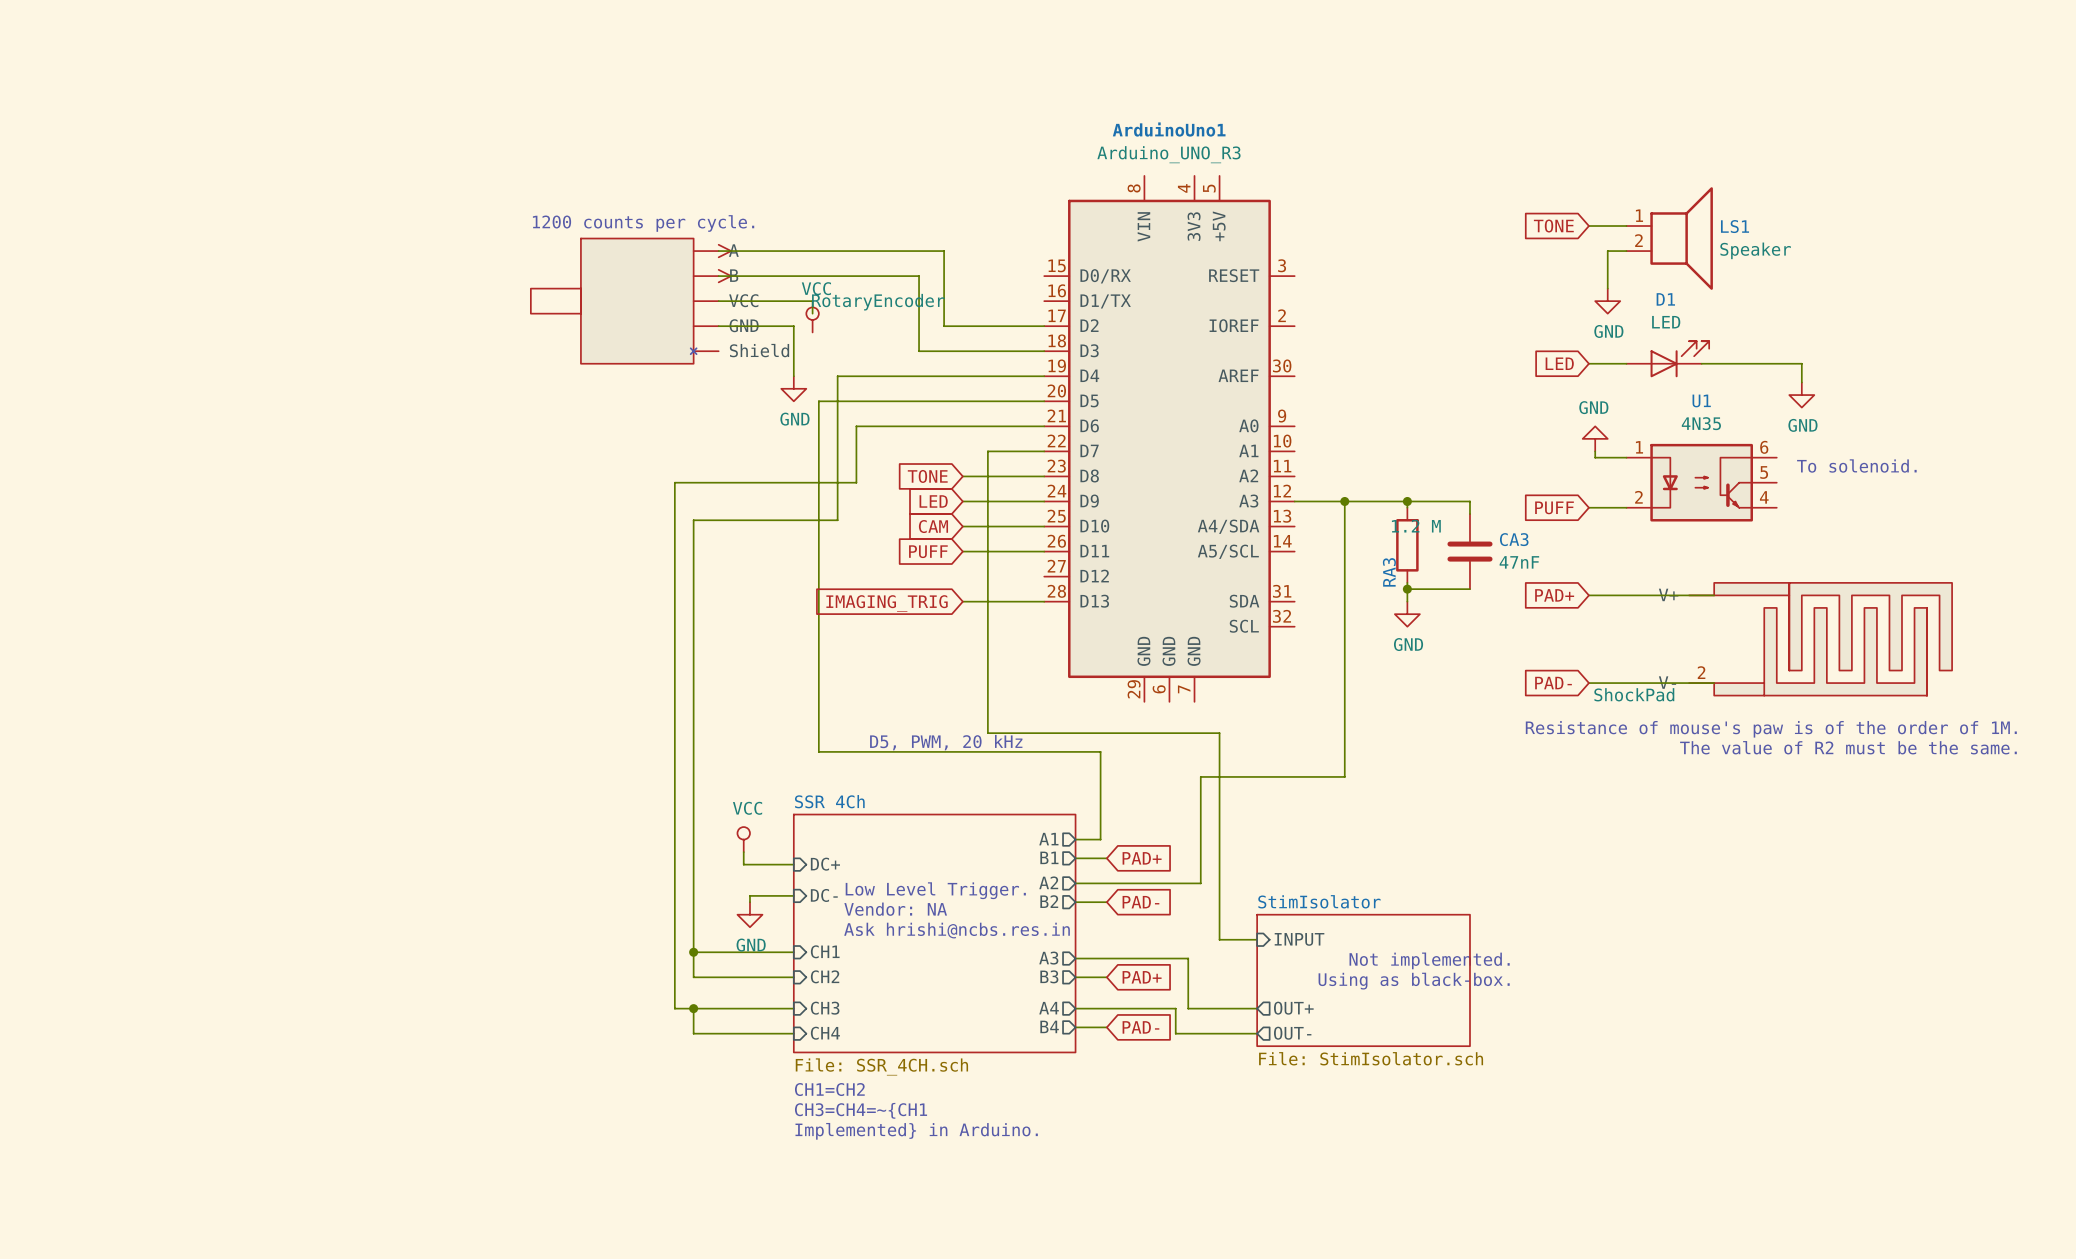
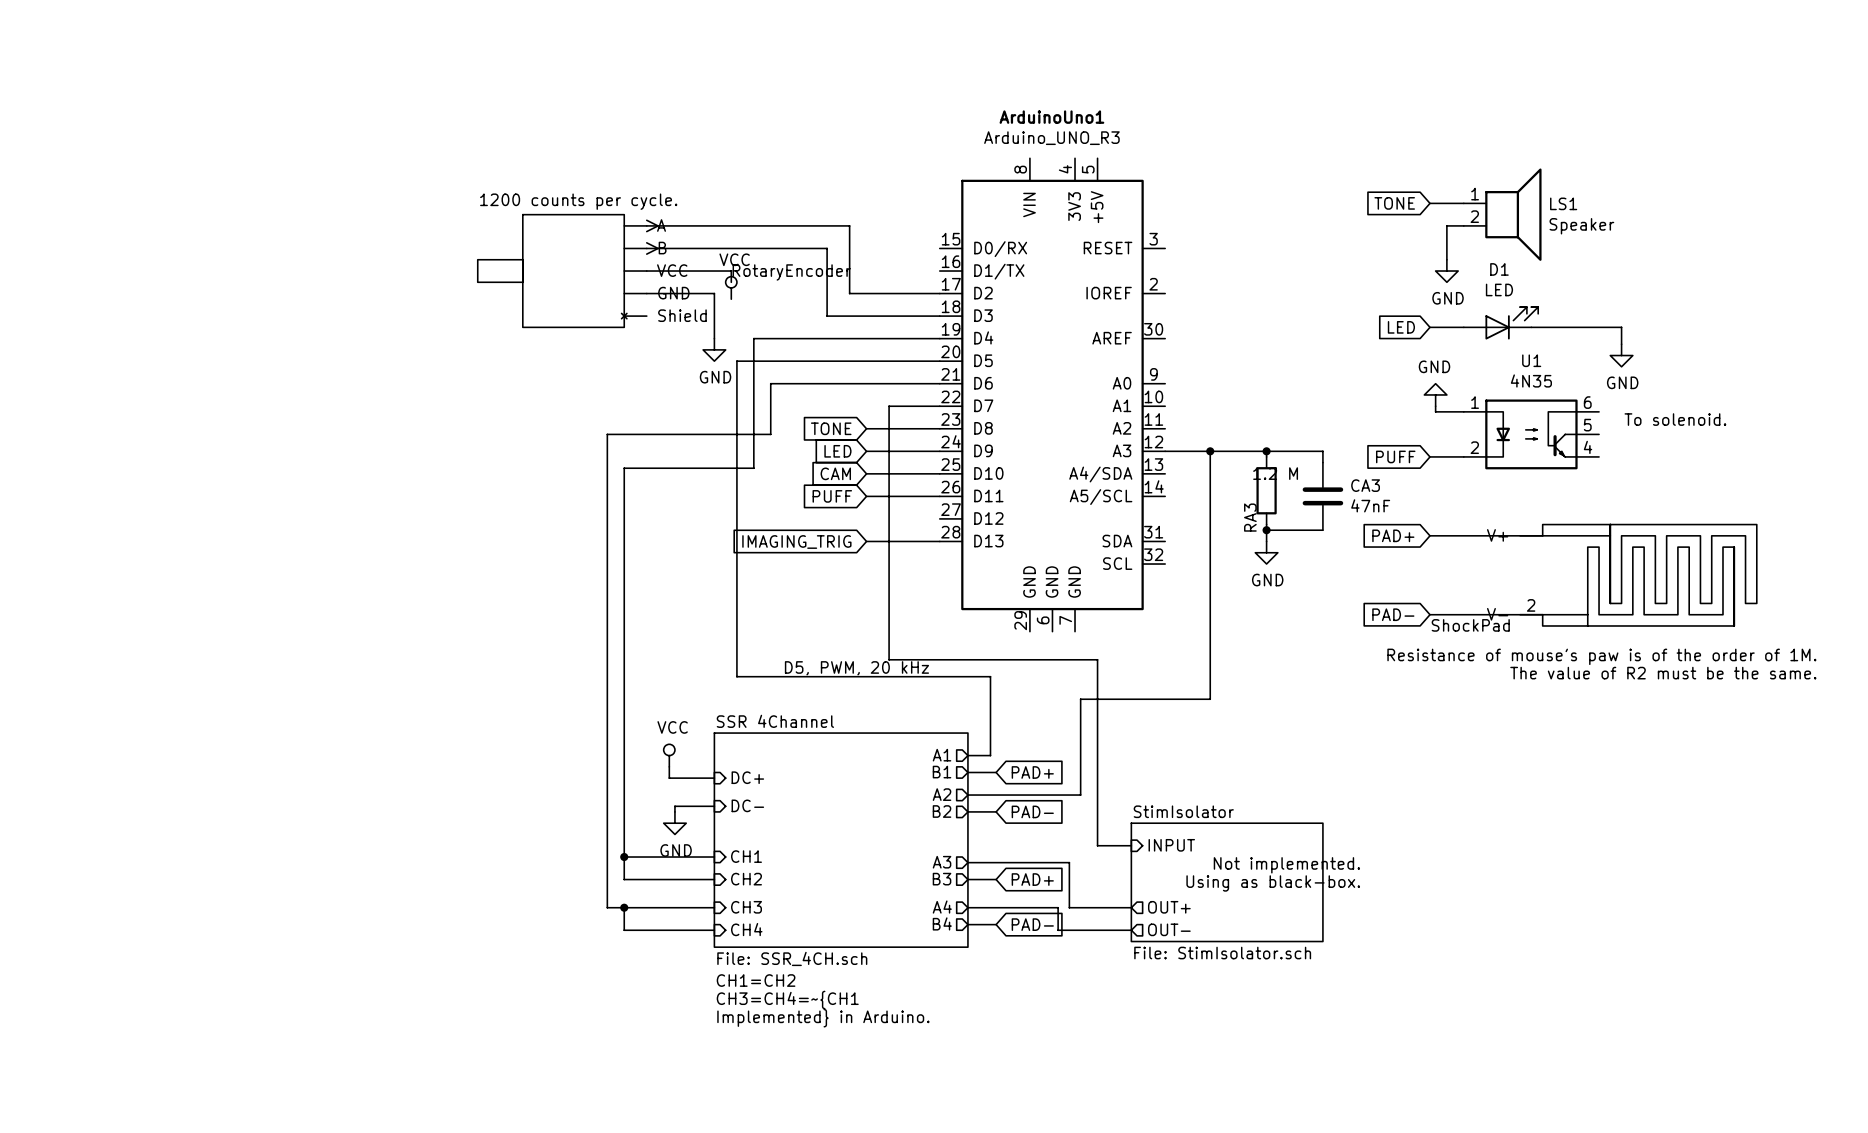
sheet SSR 4Ch name: SSR 4Ch (829, 801) -> SSR 4Channel (775, 721)
text: Low Level Trigger. (935, 890) -> none
text: Vendor: NA (895, 909) -> none
text: Ask hrishi@ncbs.res.in (957, 930) -> none

